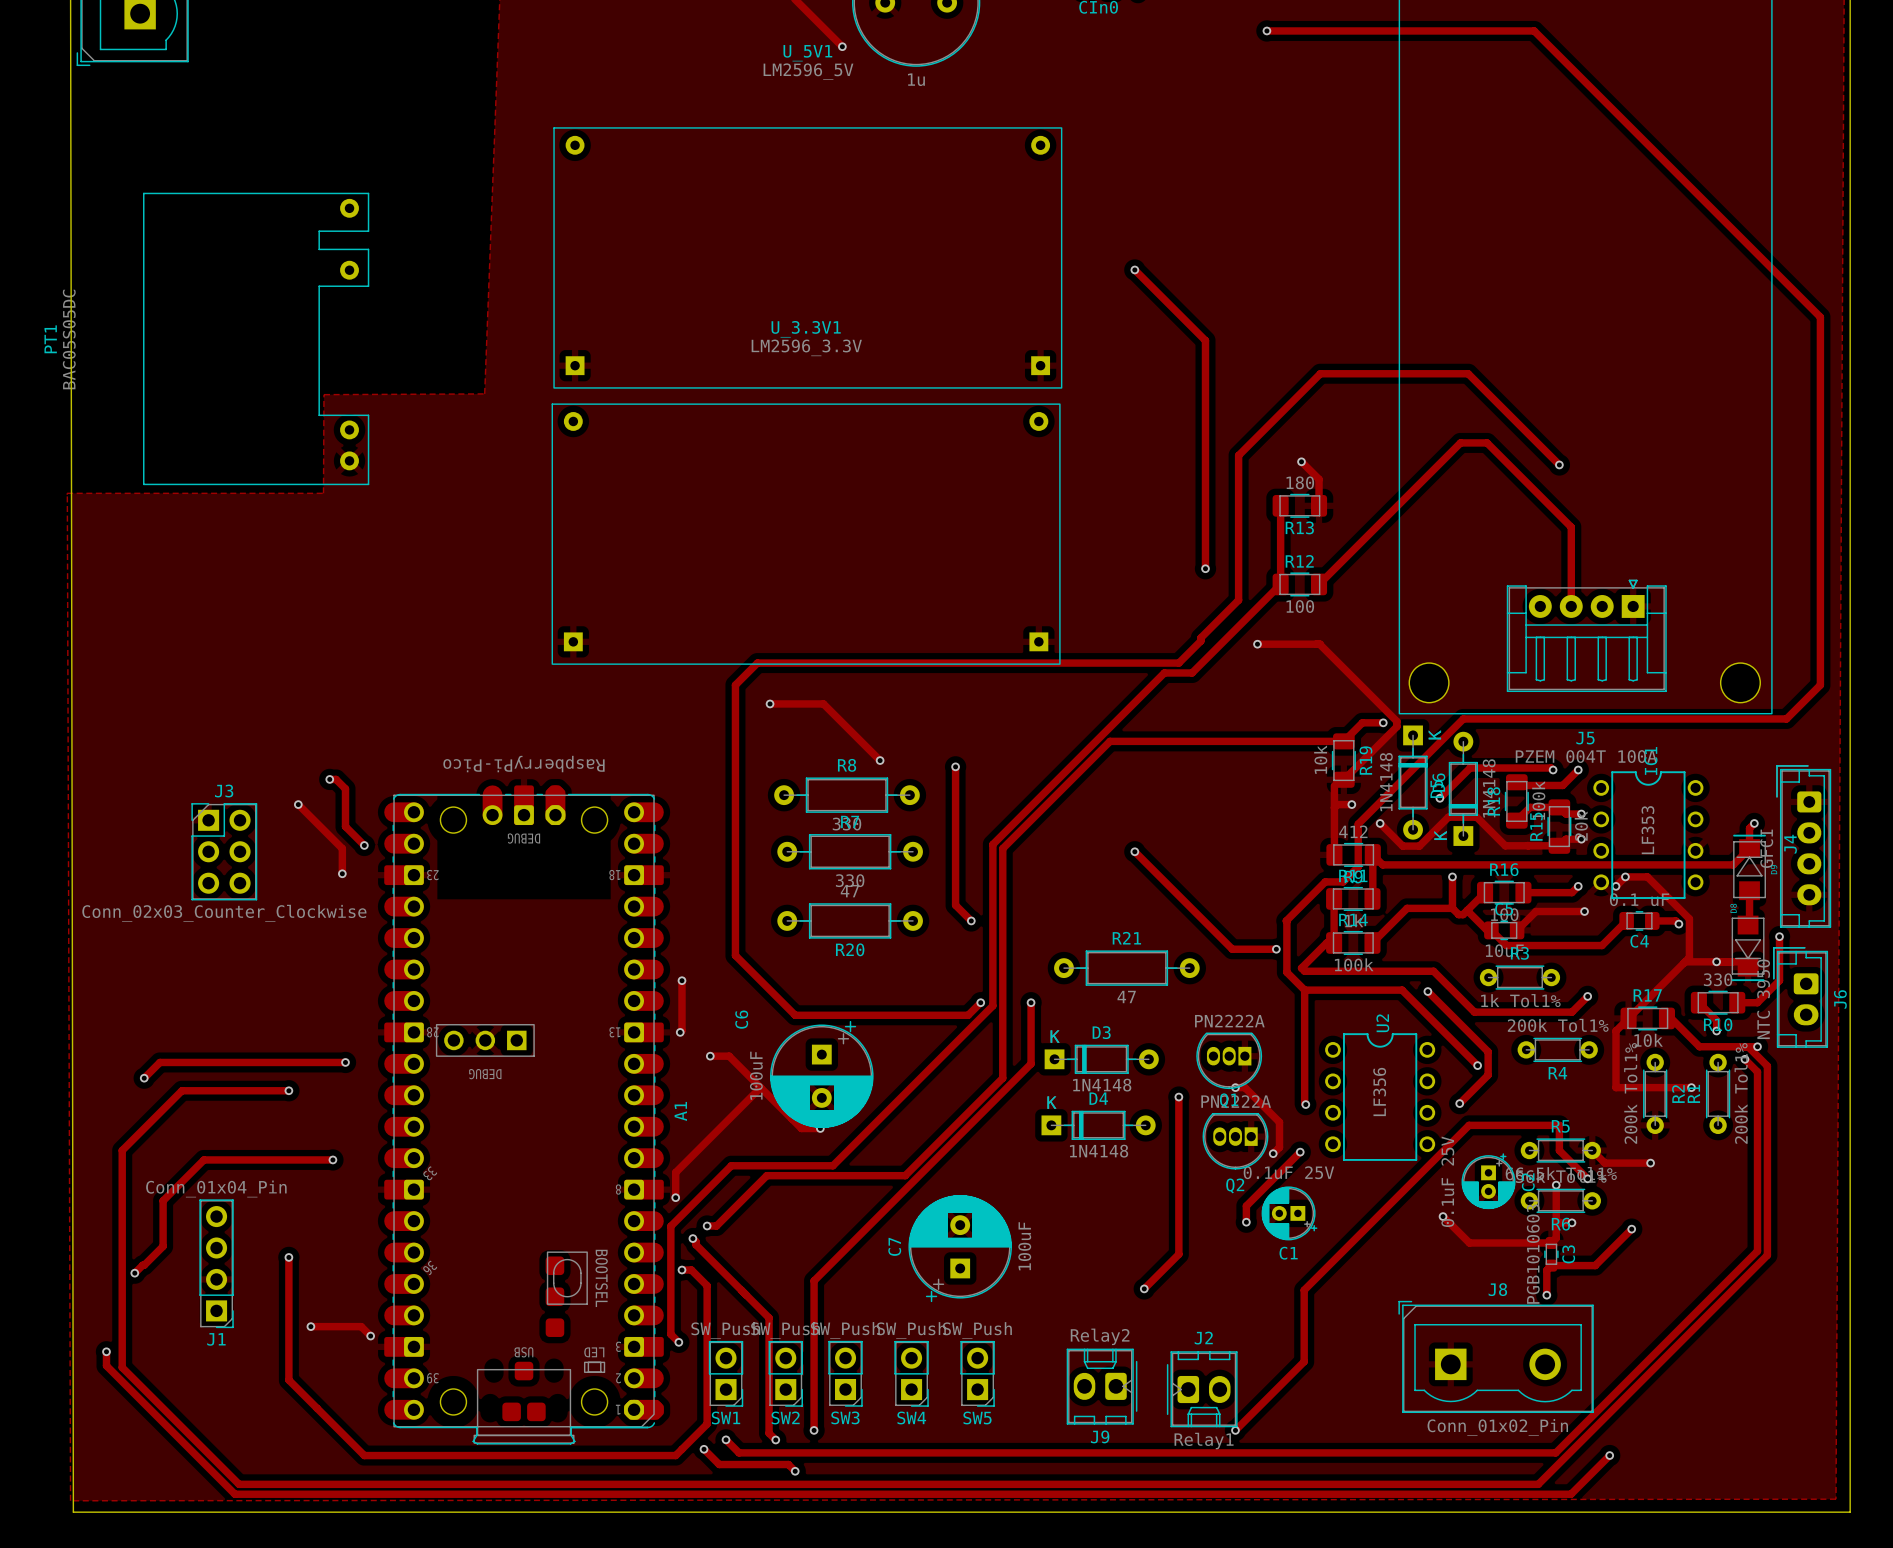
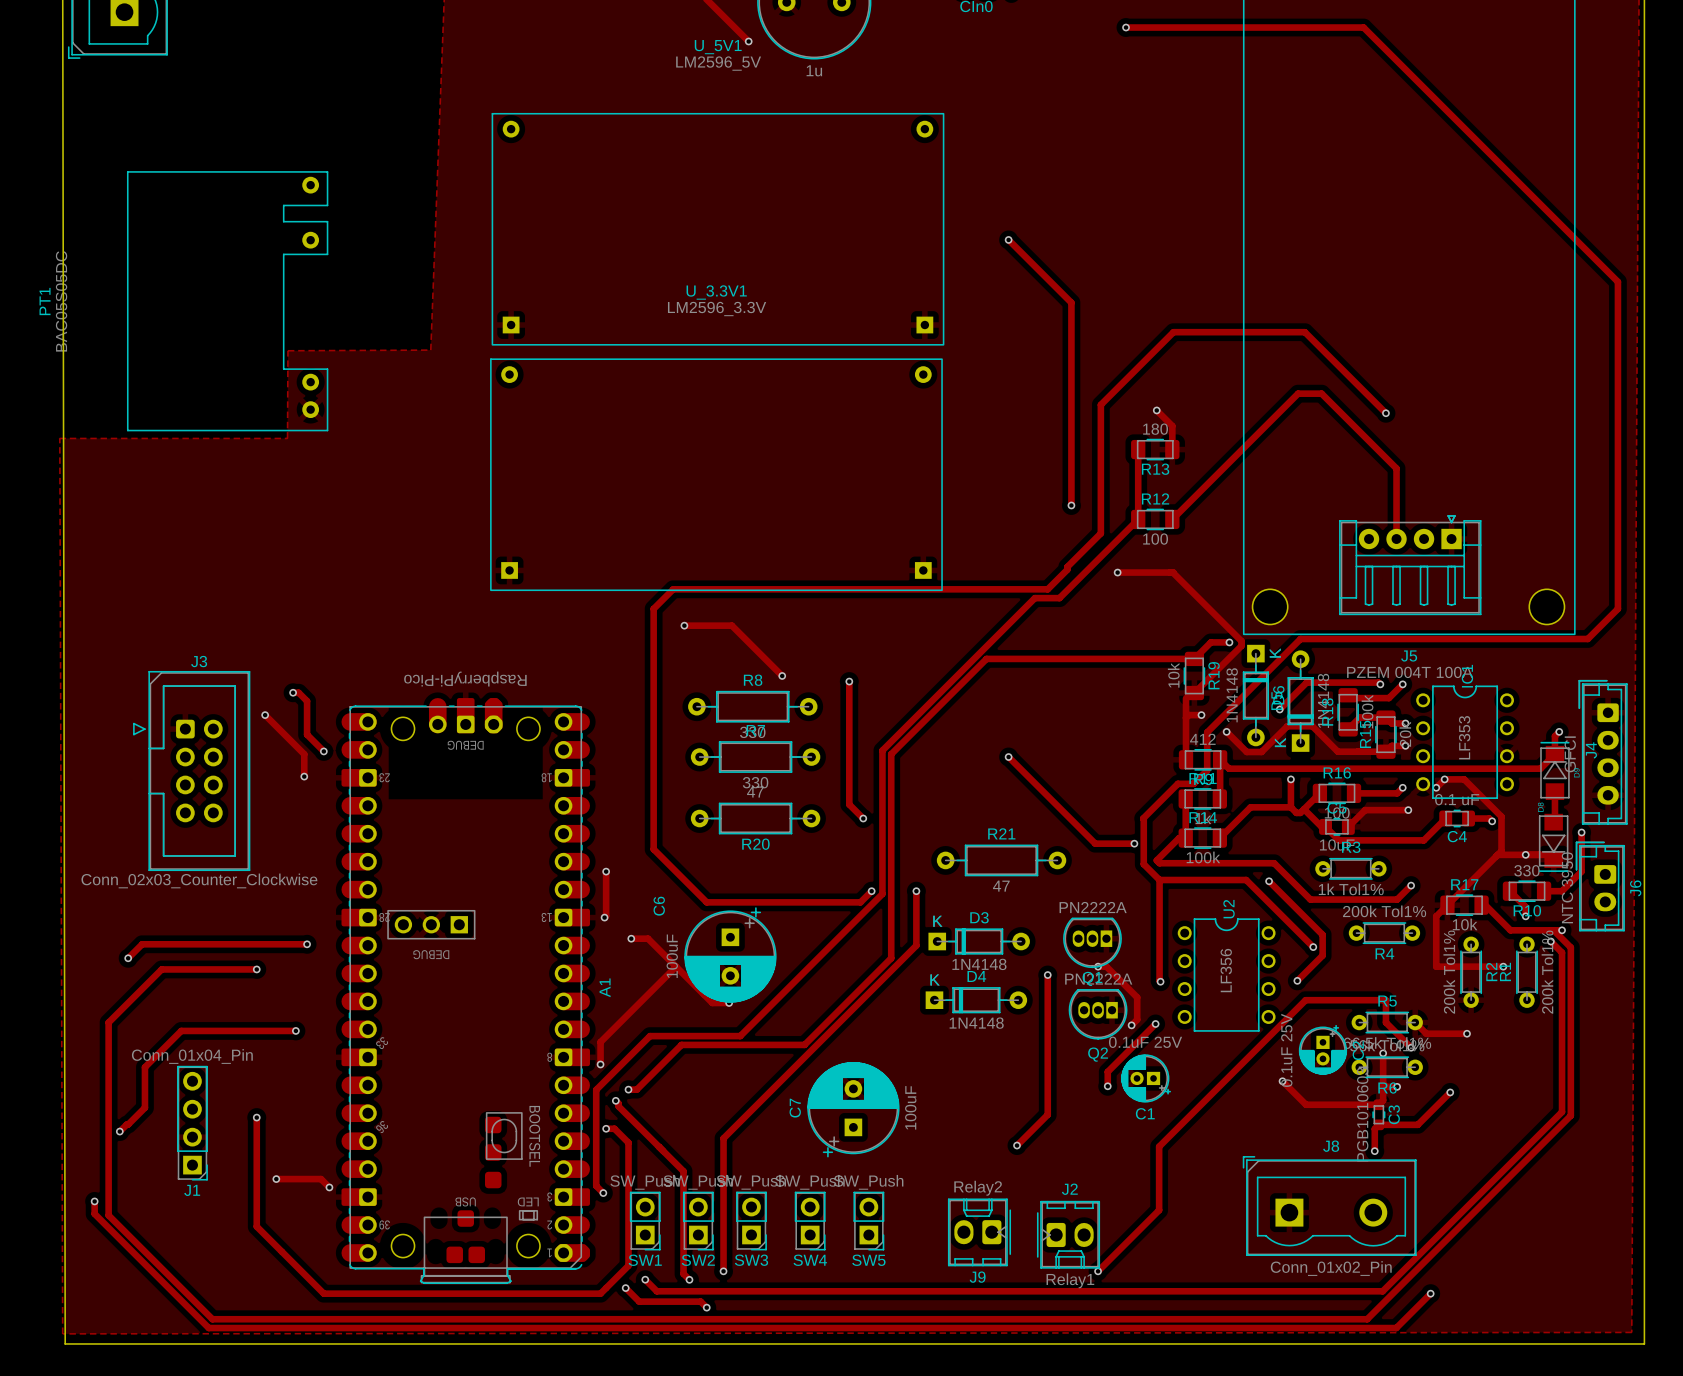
J3 name position: J3 (224, 791) -> J3 (199, 661)
J3 footprint: [191, 803, 258, 901] -> [133, 671, 251, 871]
J3 value position: Conn_02x03_Counter_Clockwise (224, 913) -> Conn_02x03_Counter_Clockwise (199, 880)

